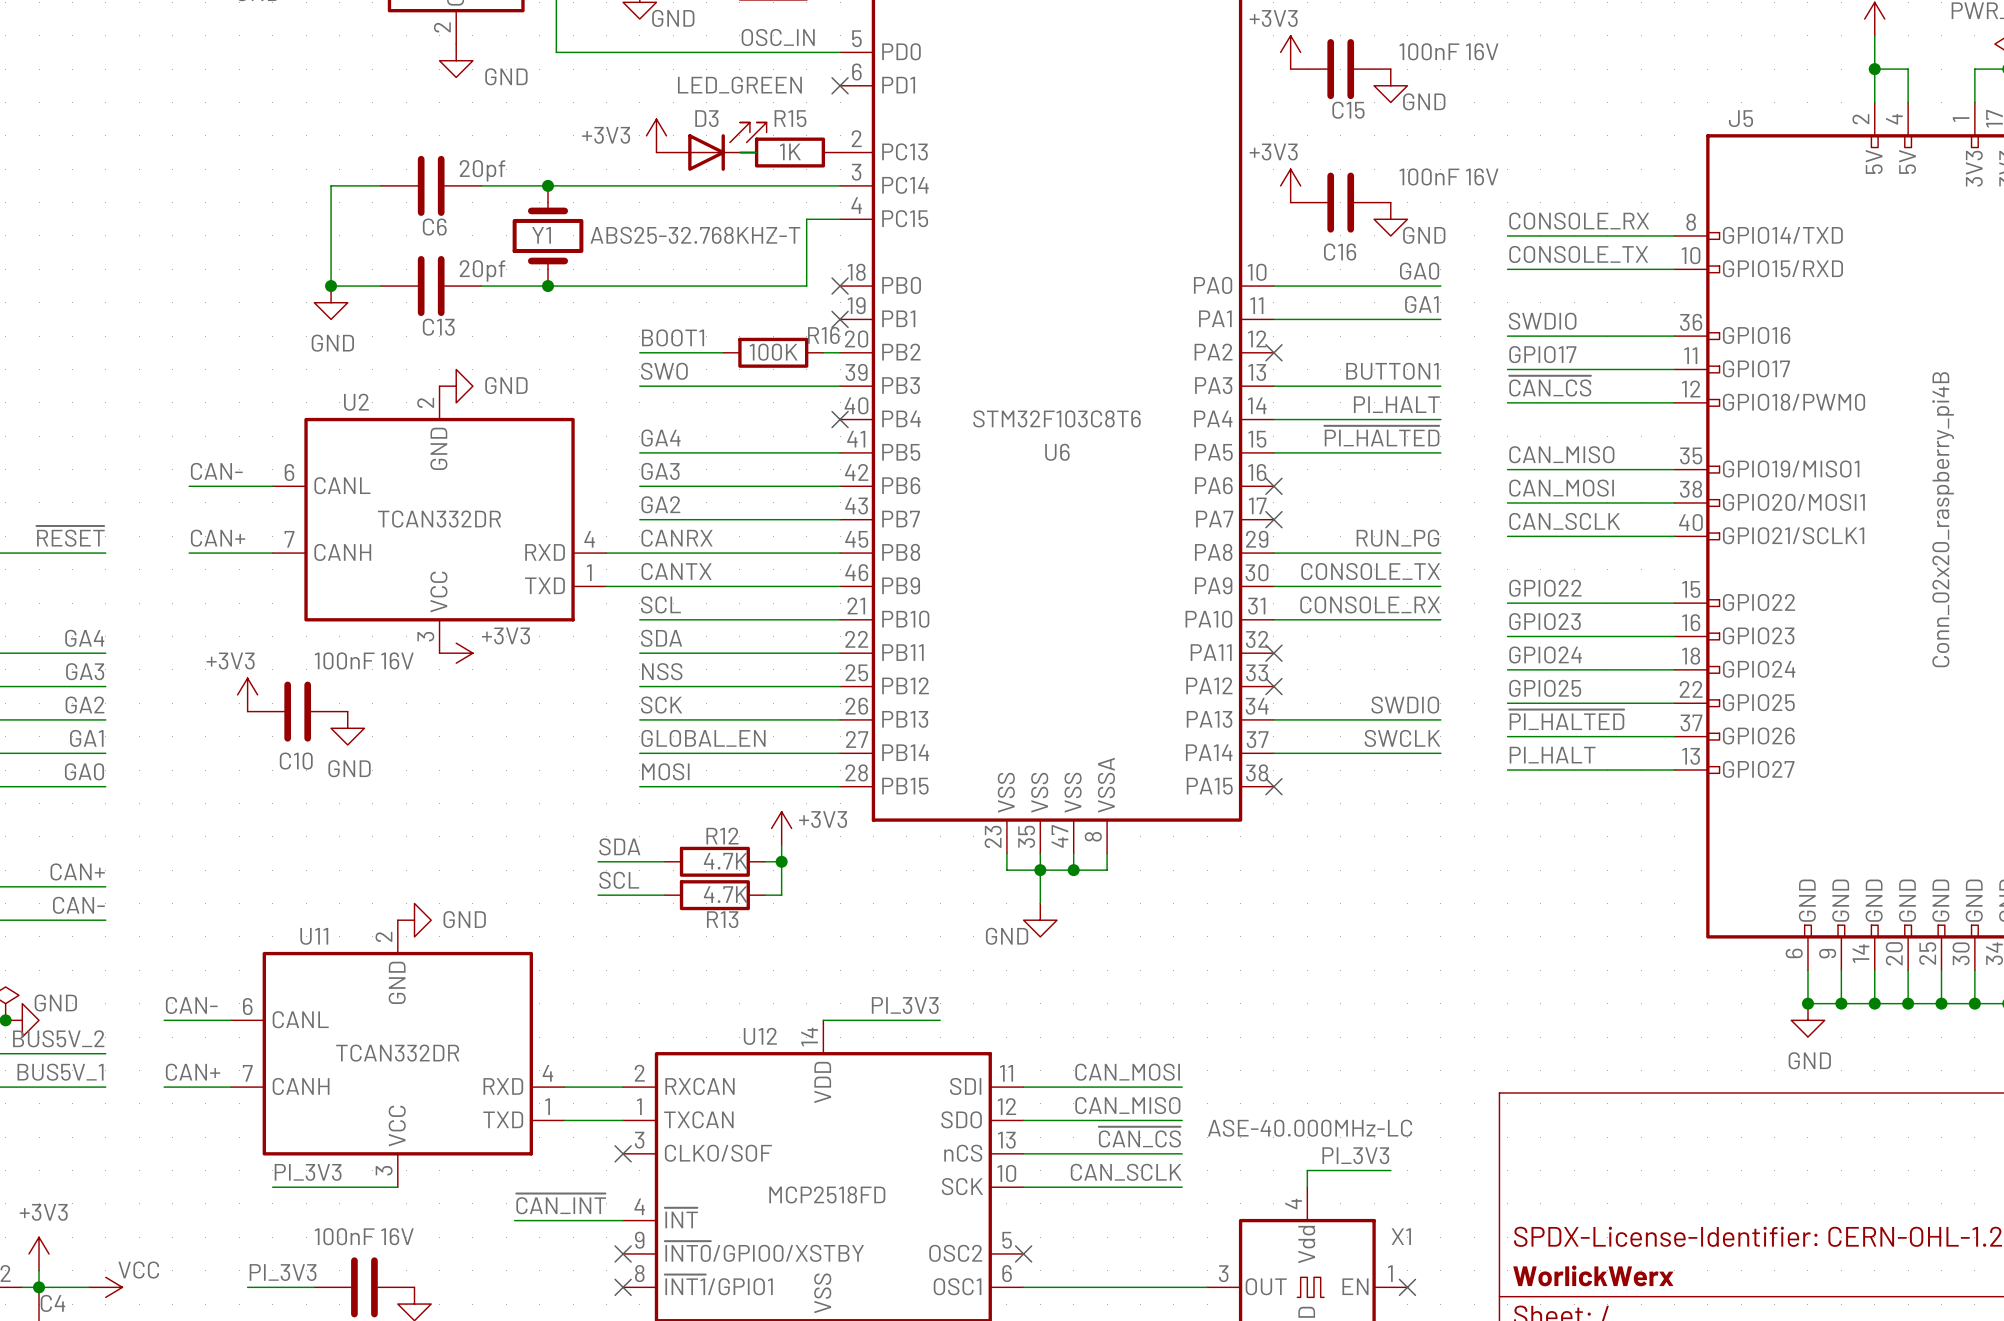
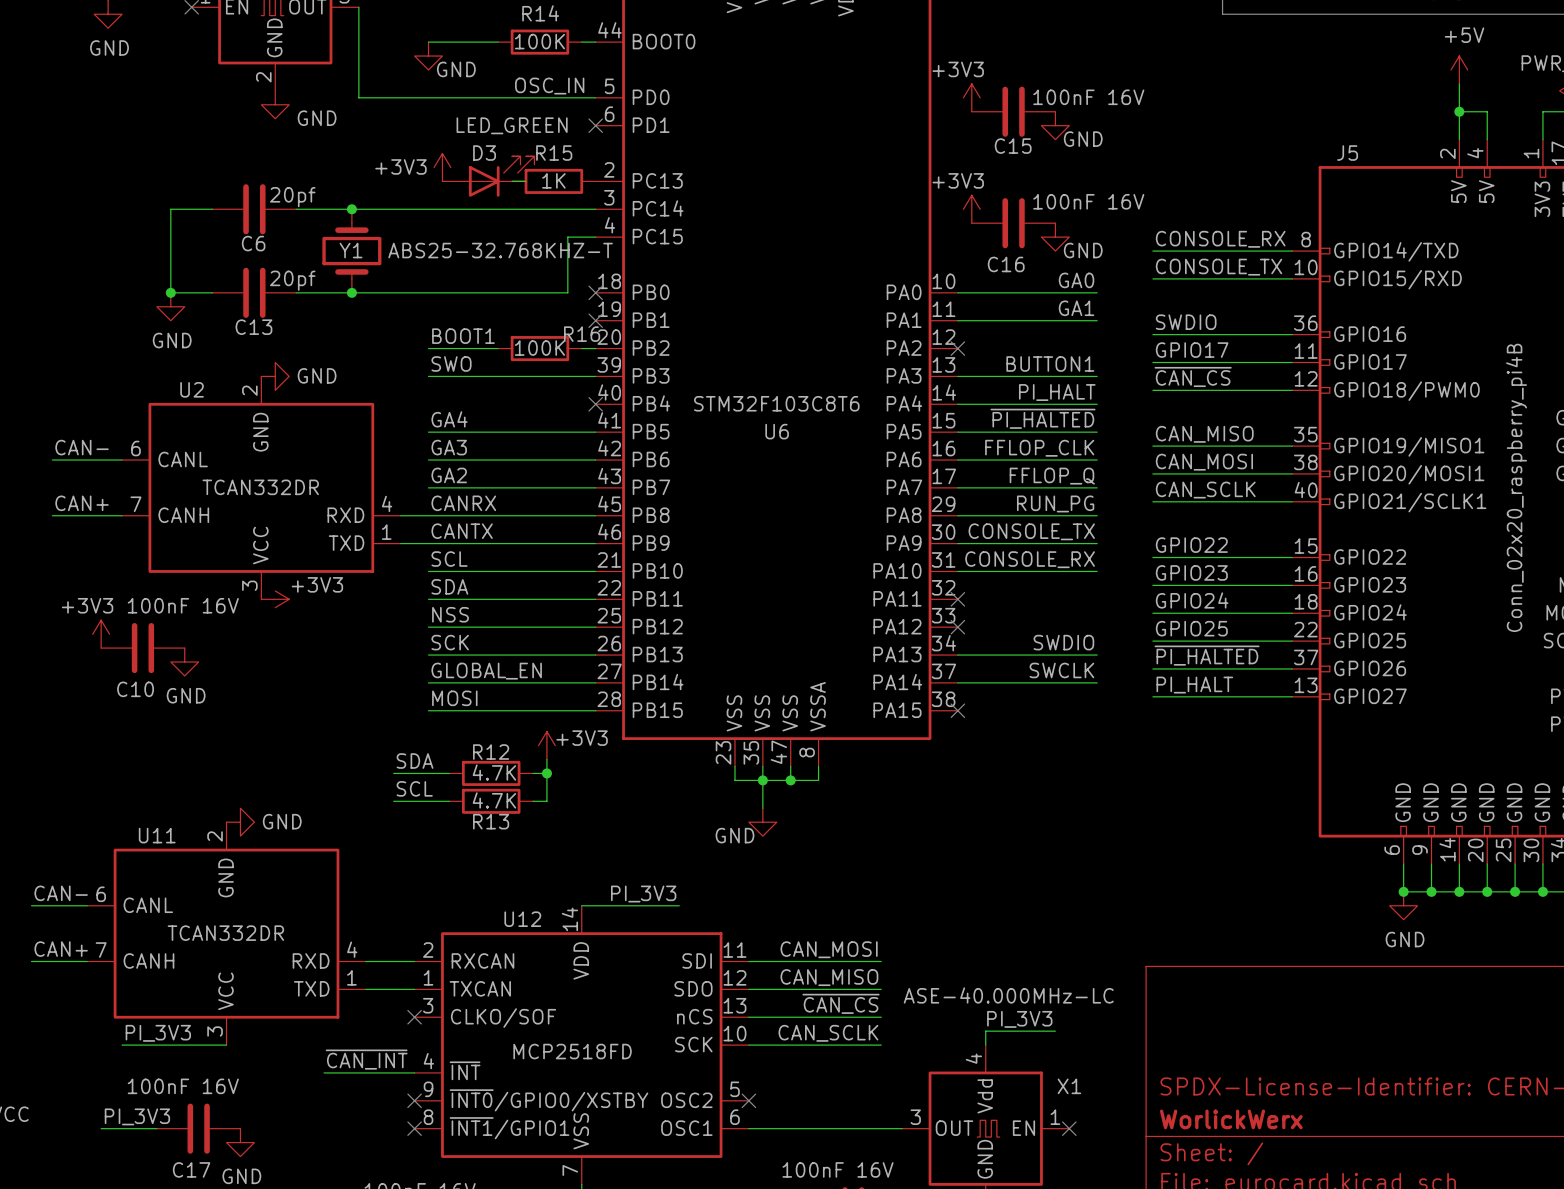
label: none -> FFLOP_CLK (1039, 448)
wire: none -> (957, 460) (1097, 460)
no-connect mark: (1273, 486) -> none
label: none -> FFLOP_Q (1052, 476)
wire: none -> (957, 487) (1097, 487)
no-connect mark: (1273, 519) -> none

